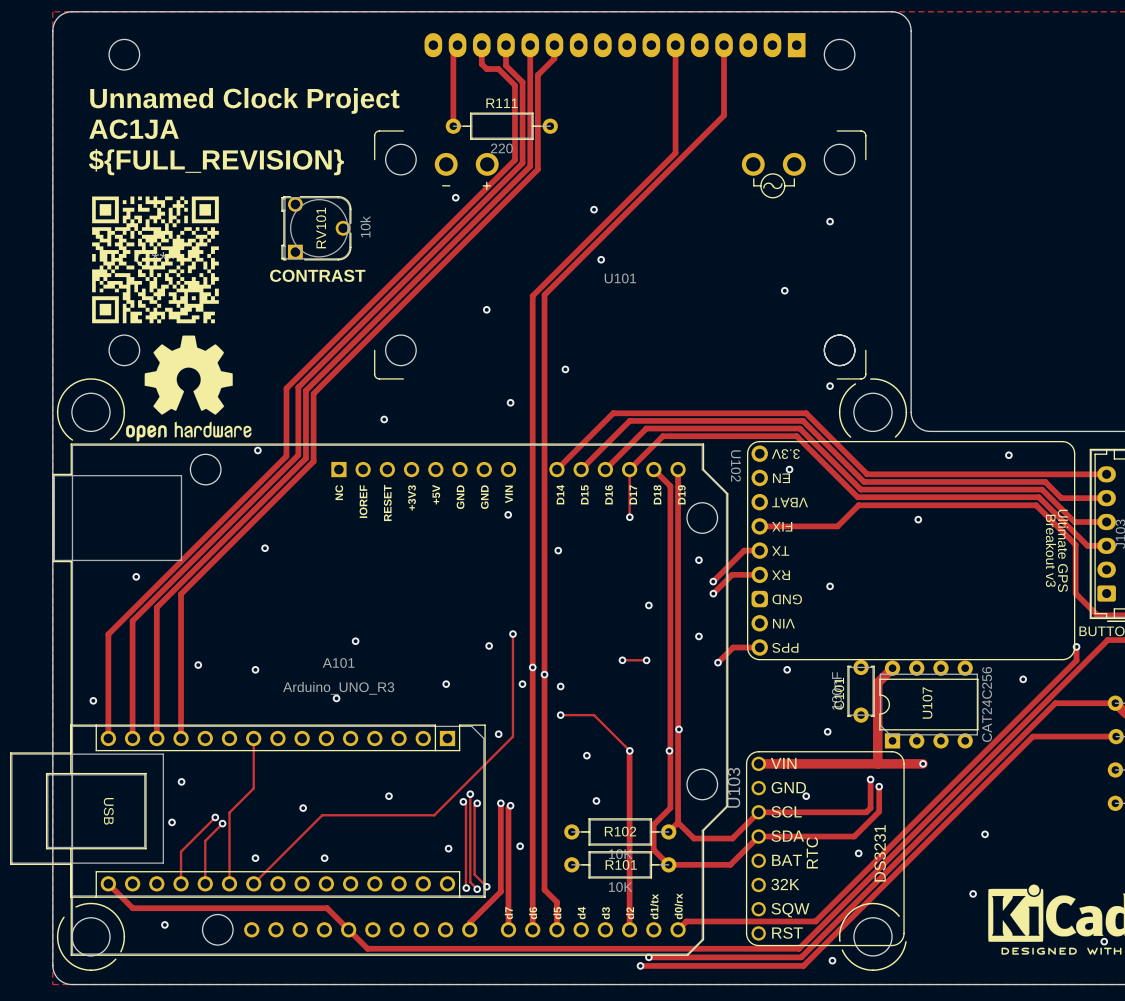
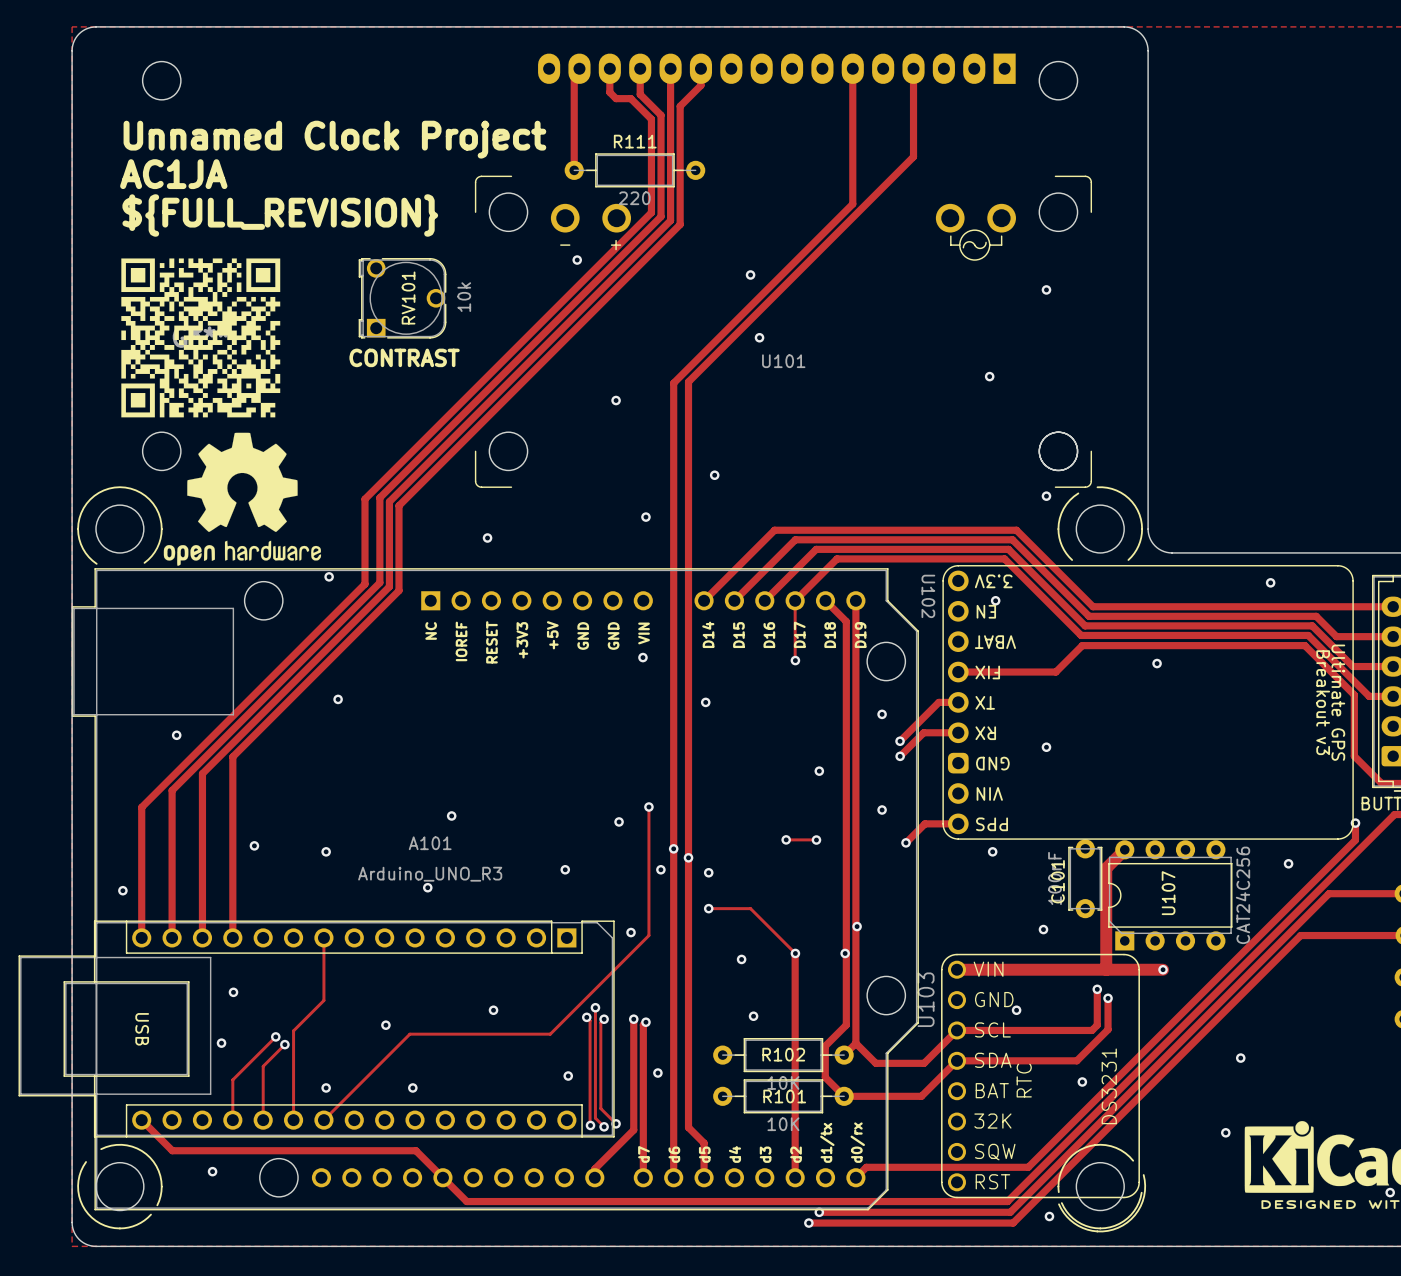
line: none -> (1143, 1175) (1145, 1190) (1140, 1206) (1127, 1222) (1113, 1229) (1097, 1231) (1082, 1228) (1066, 1216) (1058, 1204)

